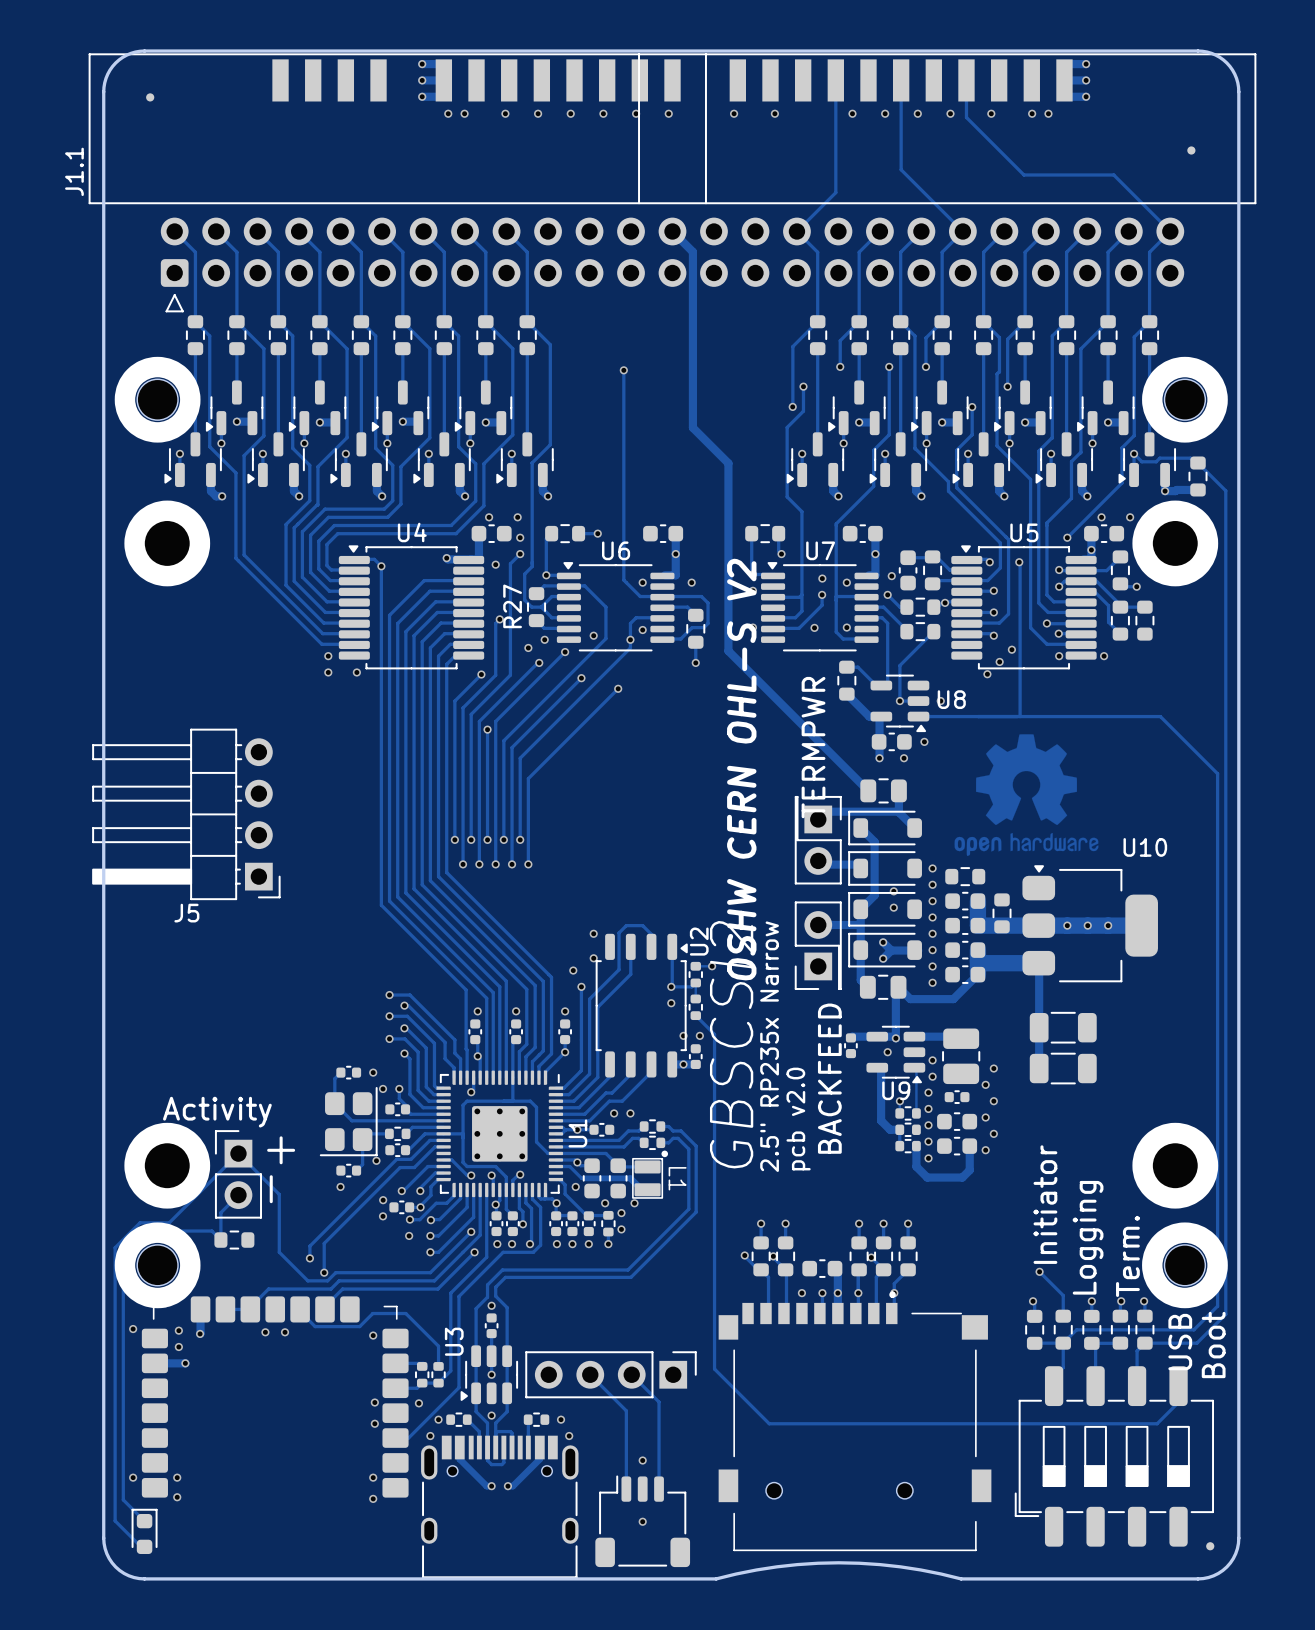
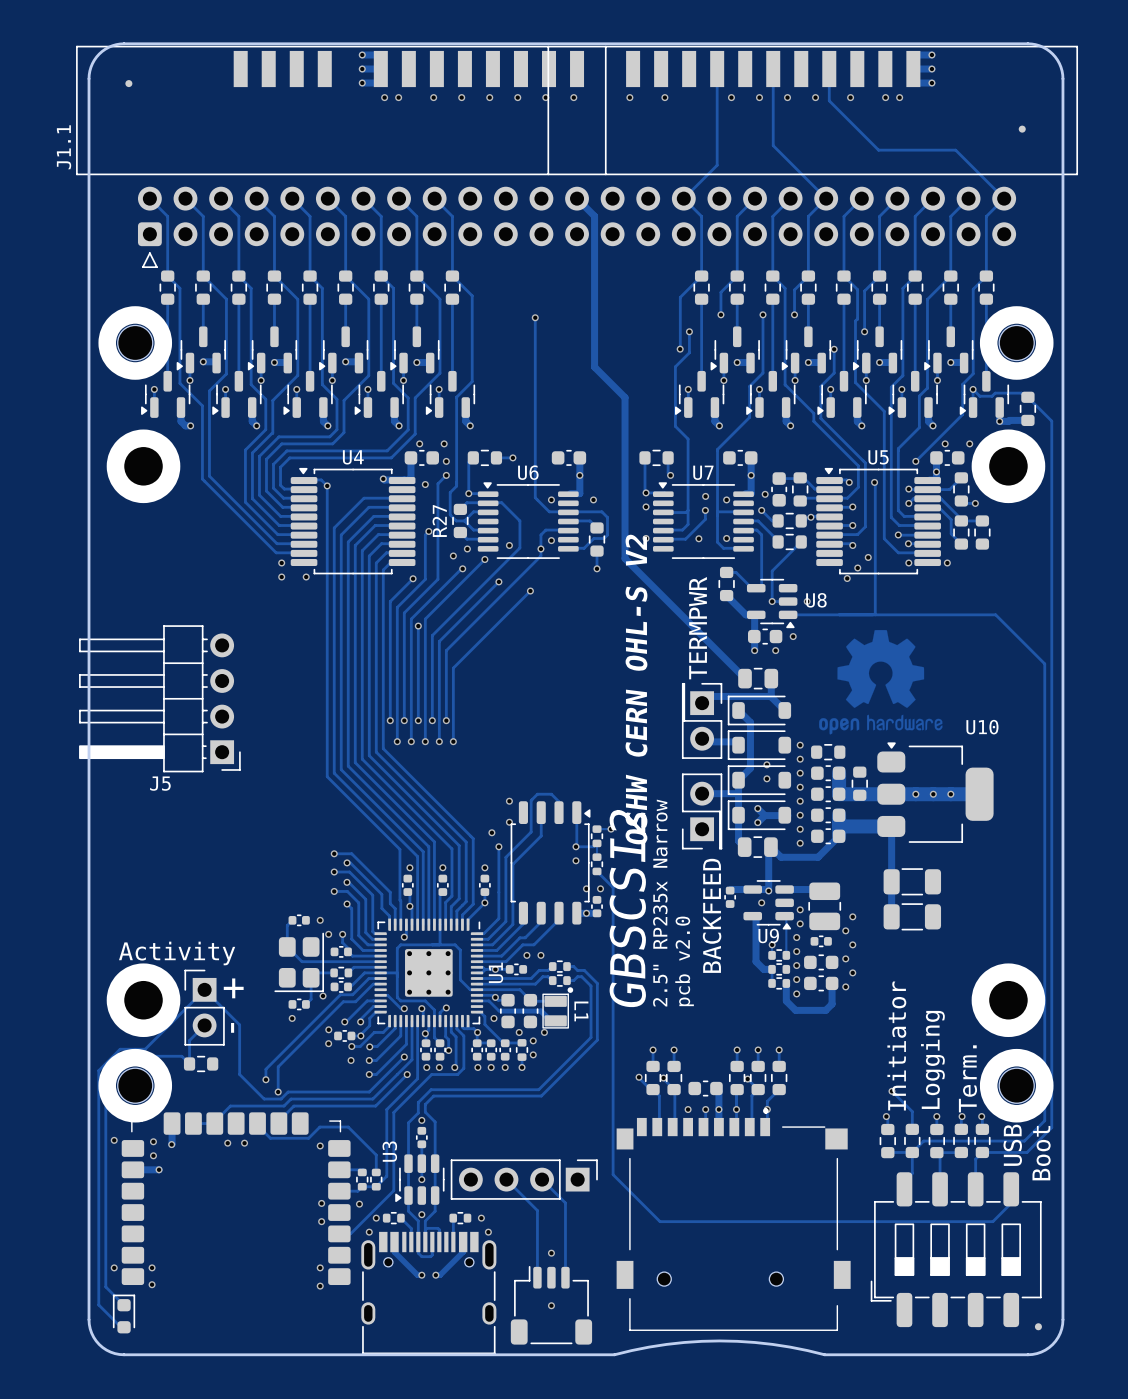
U2: (641, 1005) -> none
part: none -> (550, 862)

